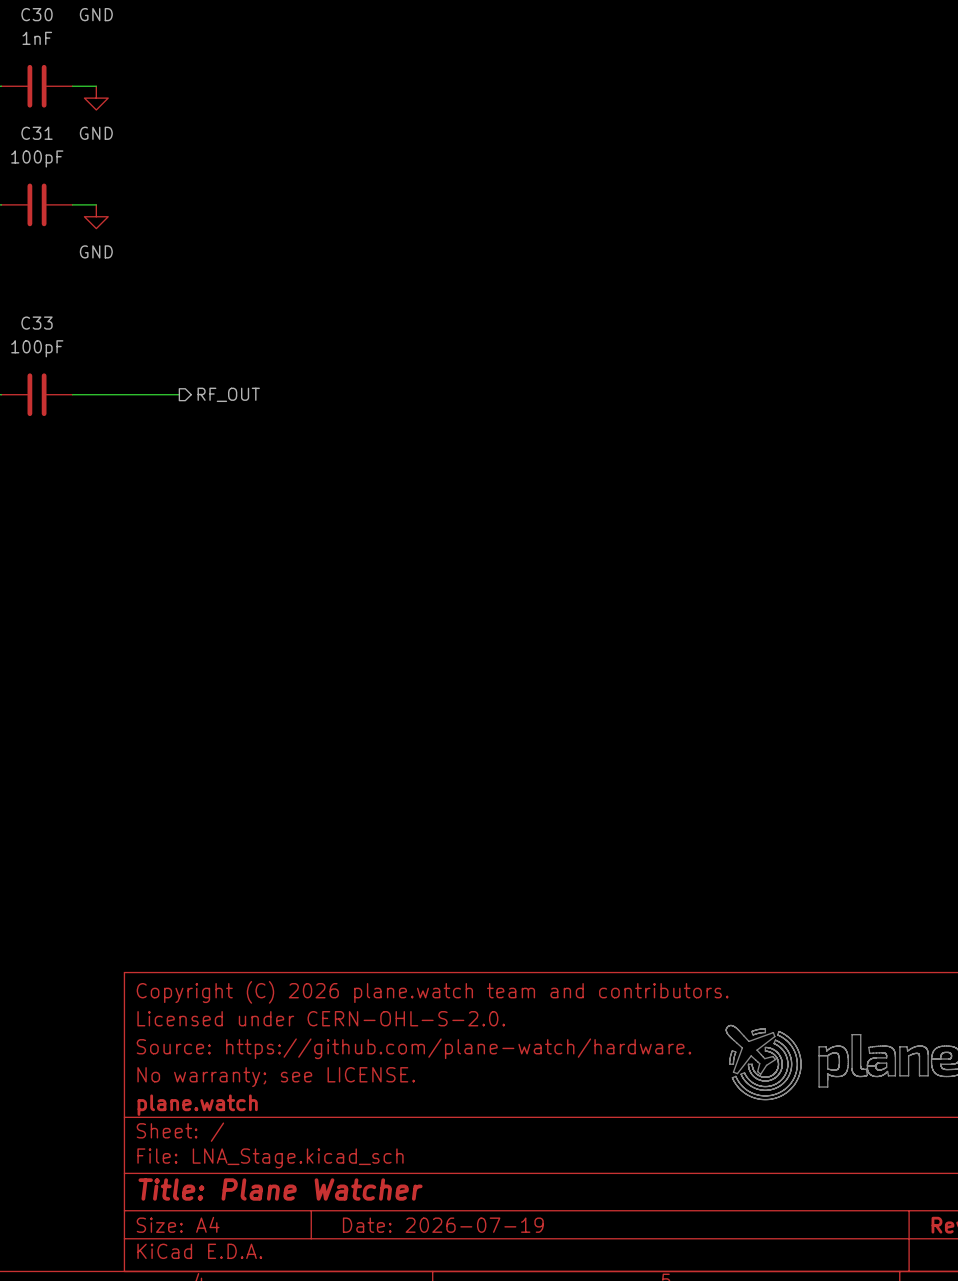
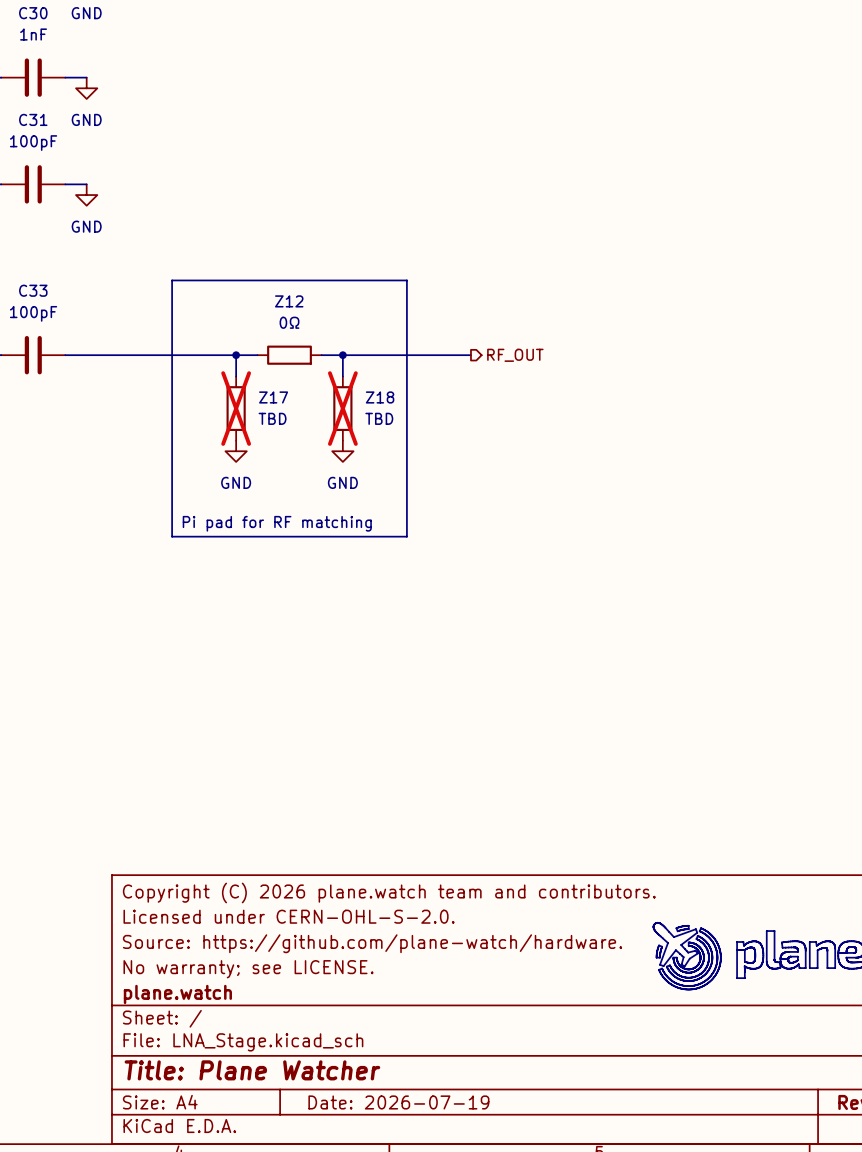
line: none -> (172, 280) (406, 280) (406, 536) (172, 536) (172, 280)
wire: none -> (161, 355) (257, 355)
hierarchical label: RF_OUT (228, 394) -> none
wire: none -> (236, 355) (236, 376)
junction: none -> (236, 355)
Z12: none -> 0Ω (289, 355)
wire: none -> (321, 355) (470, 355)
wire: none -> (342, 355) (342, 376)
junction: none -> (342, 355)
hierarchical label: none -> RF_OUT (515, 355)
Z17: none -> TBD (236, 408)
Z18: none -> TBD (342, 408)
power symbol: none -> GND (236, 451)
power symbol: none -> GND (342, 451)
text: none -> Pi pad for RF matching (277, 523)

